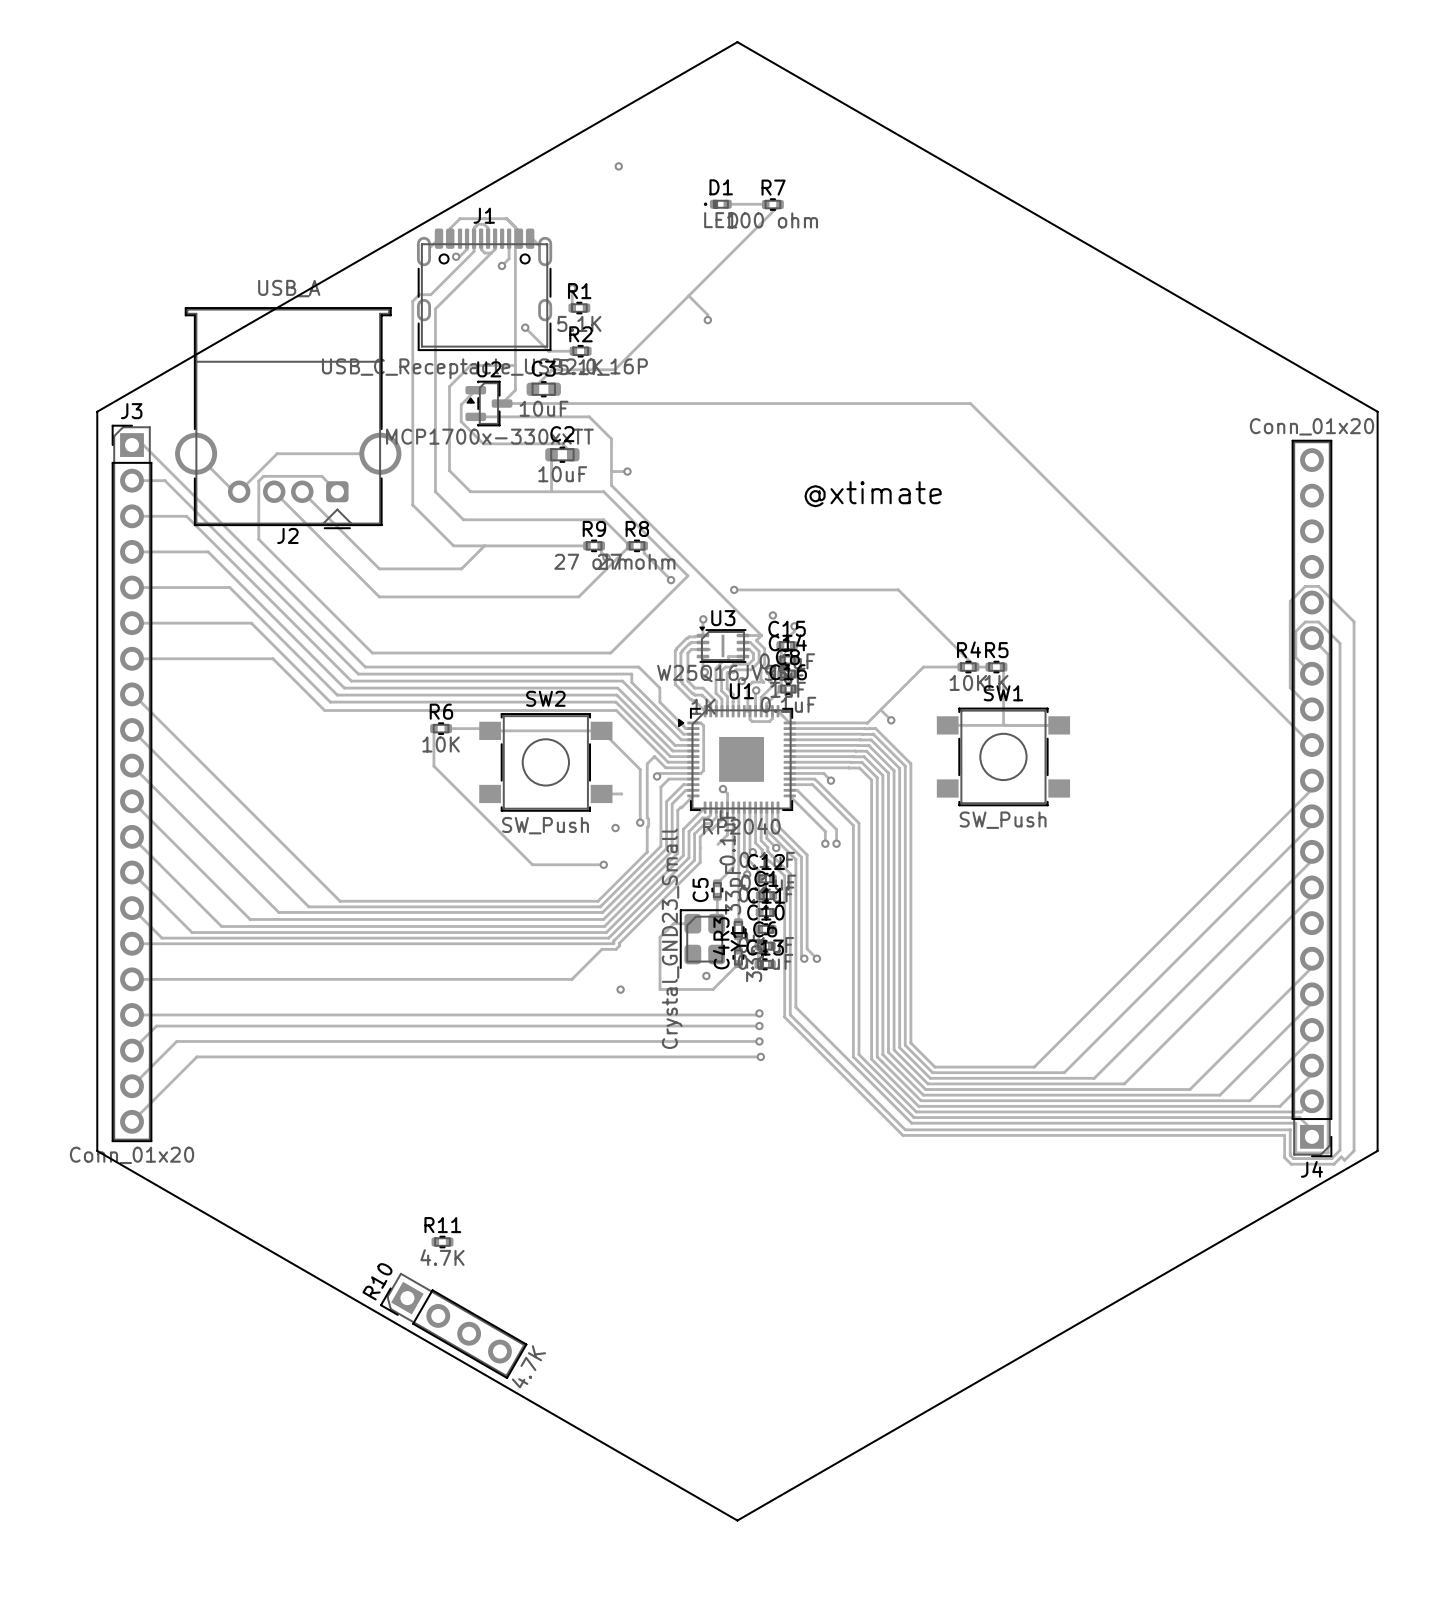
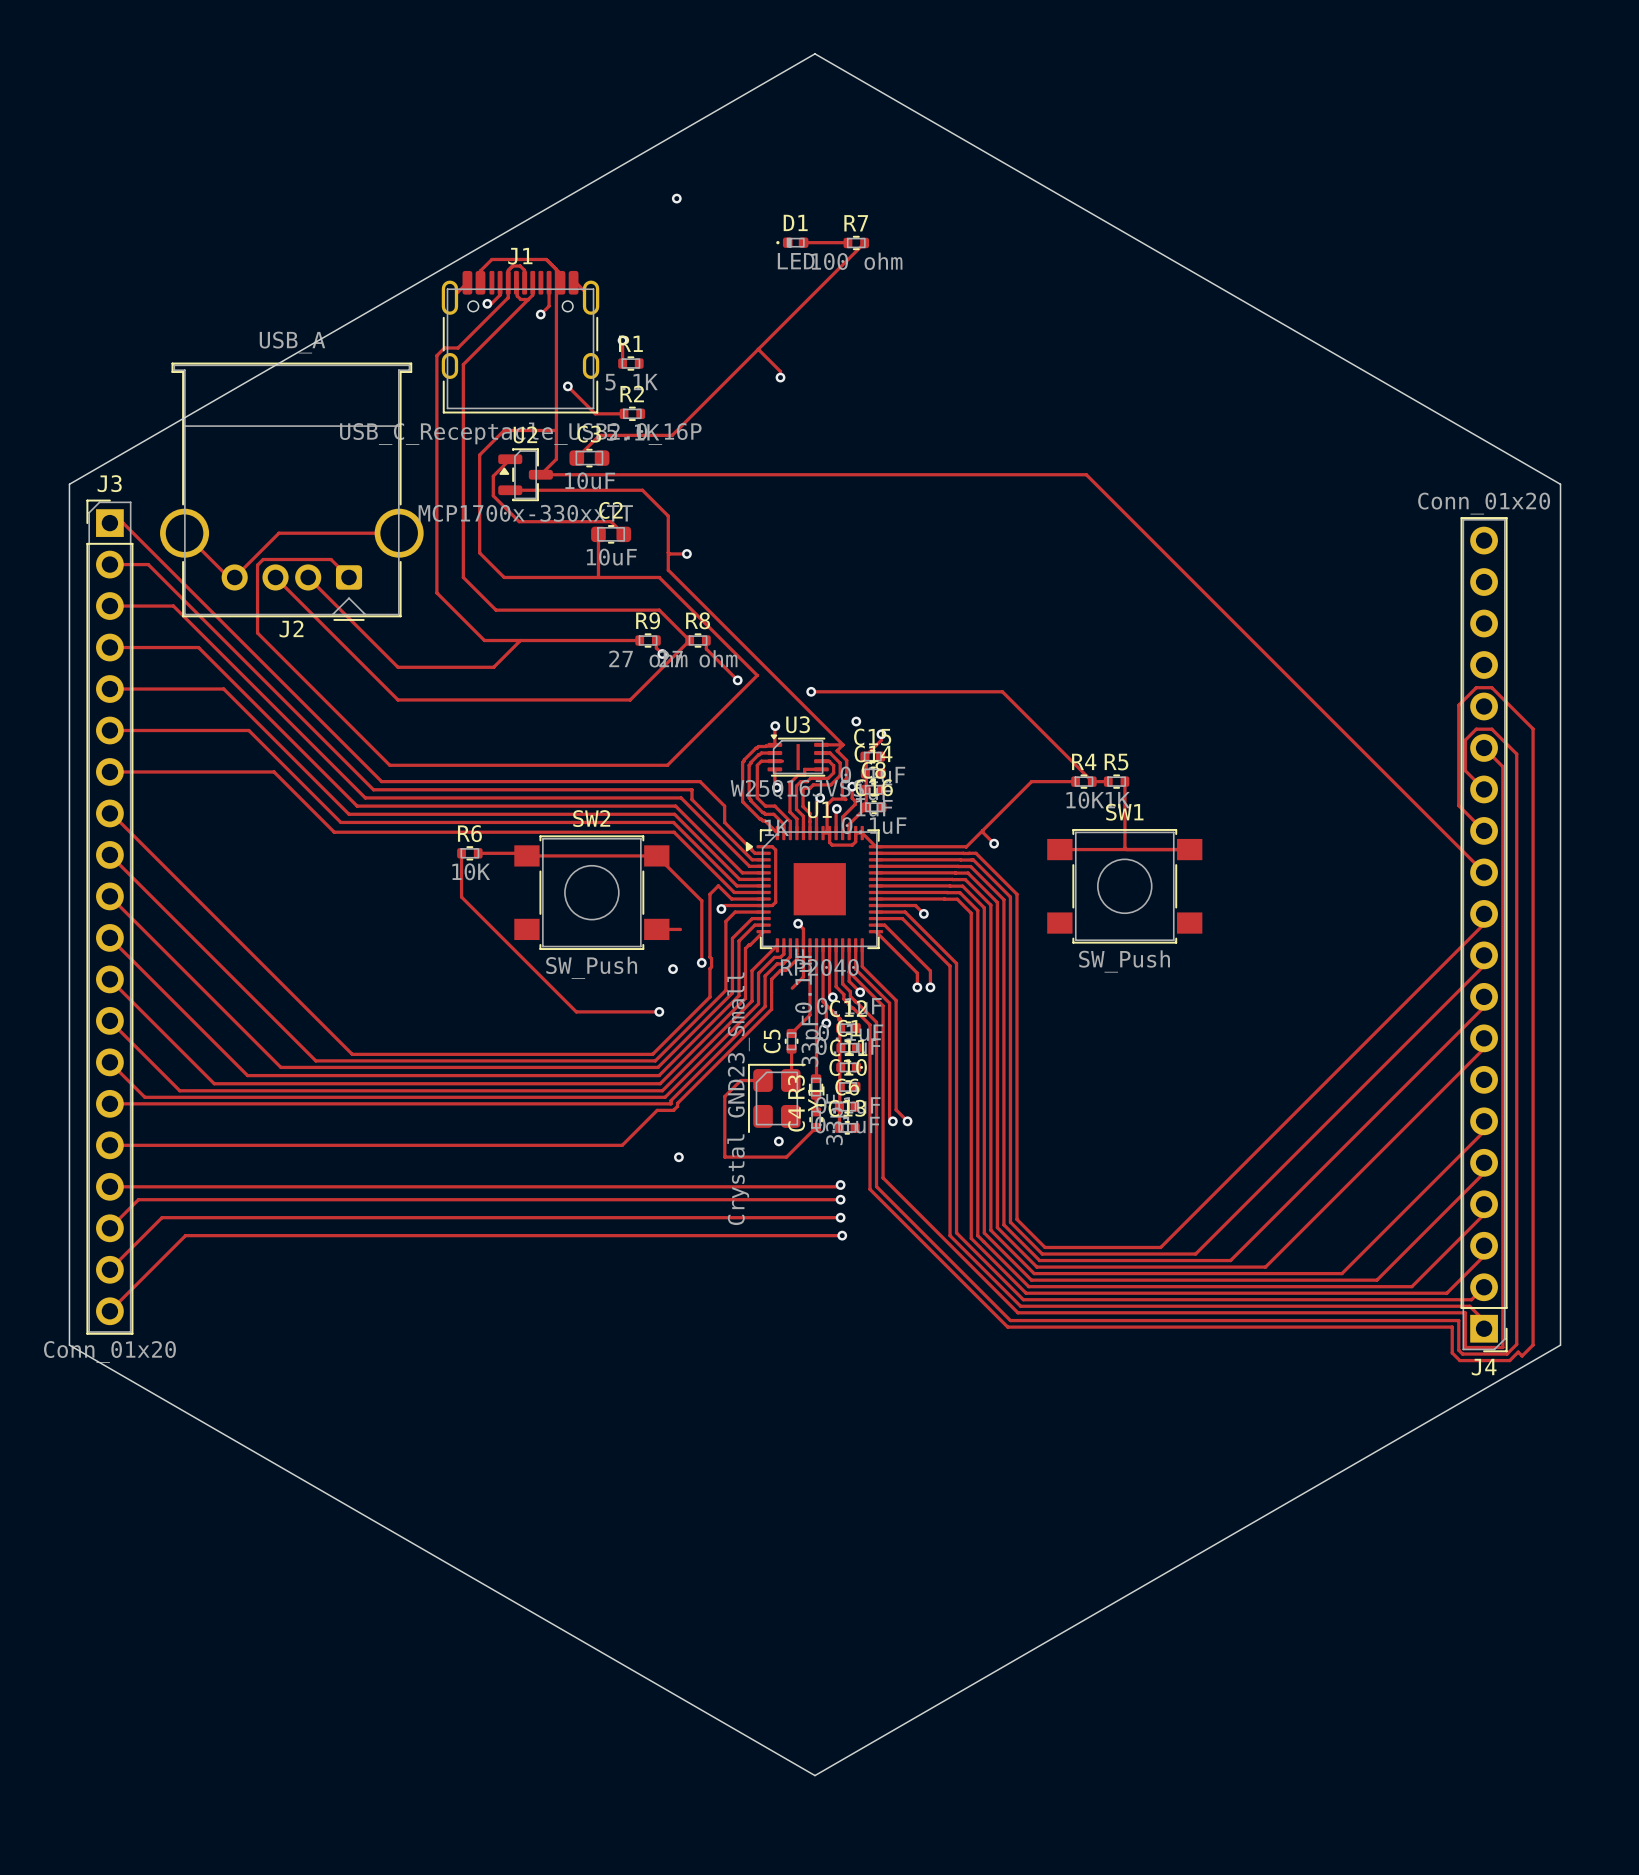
text: @xtimate (873, 494) -> none
R11: 4.7K (442, 1242) -> none
R10: 4.7K (453, 1325) -> none

